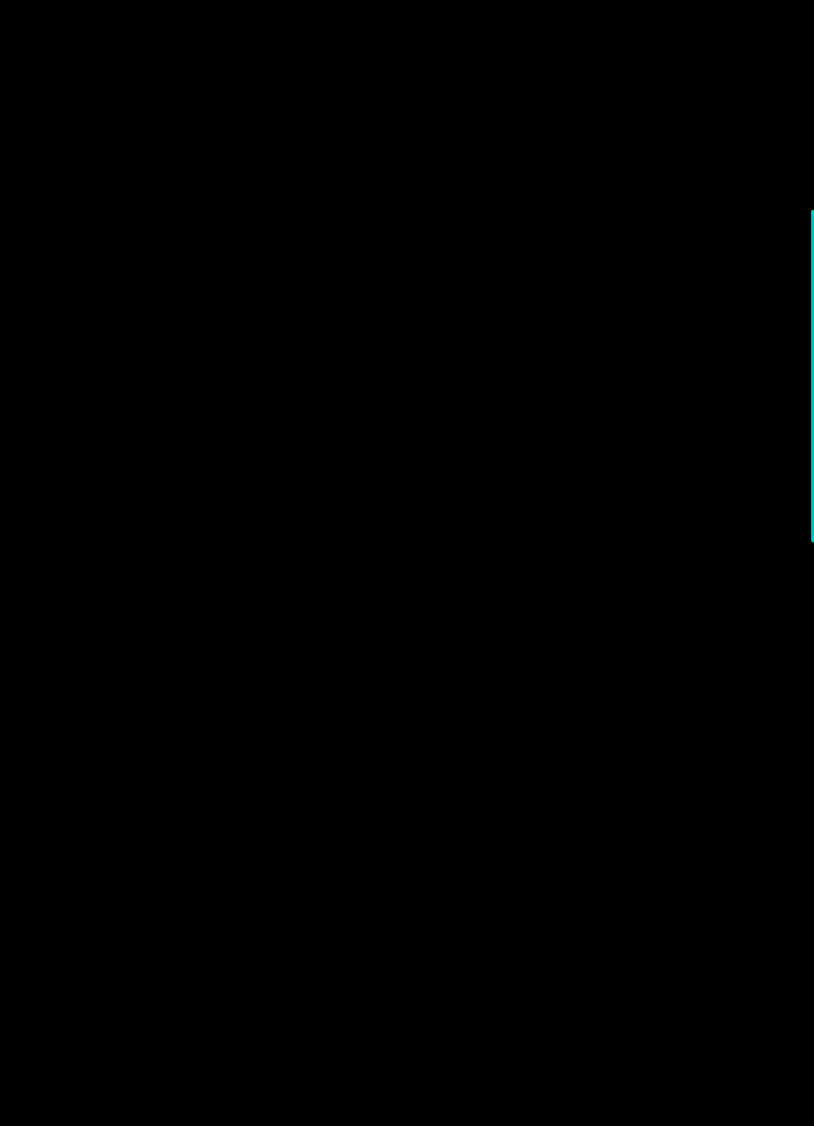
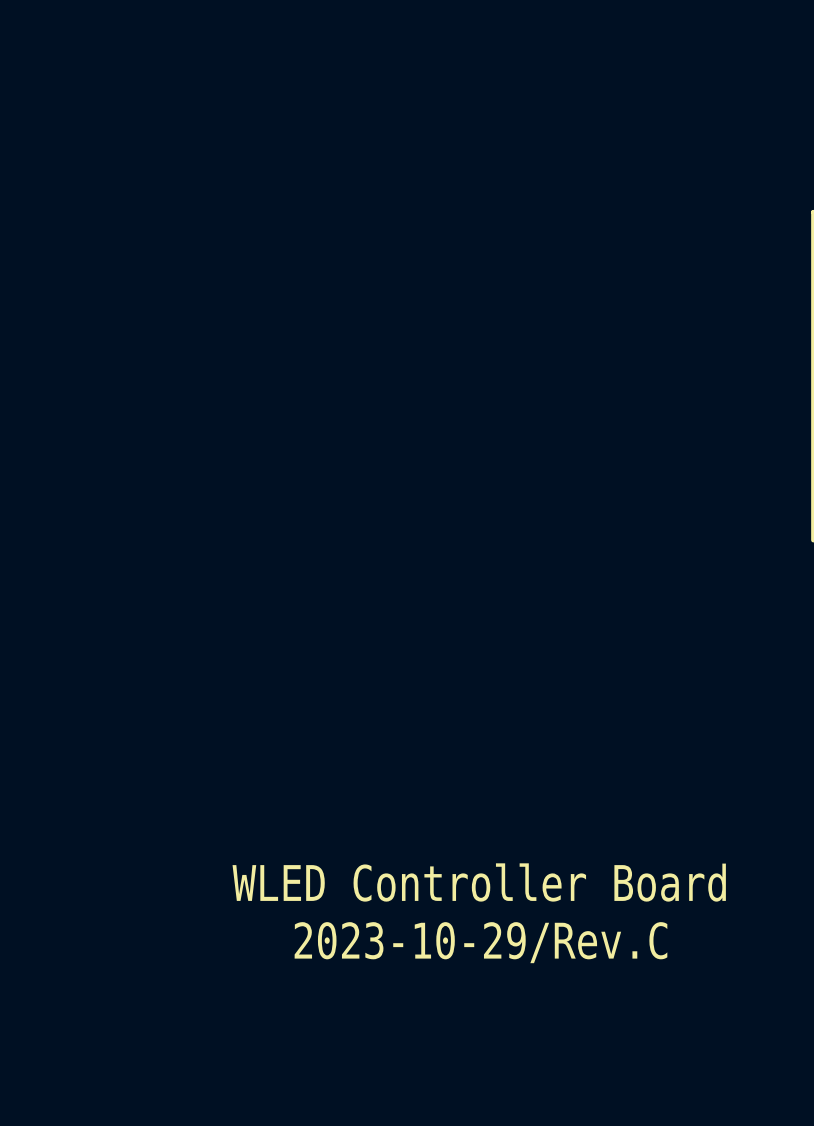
text: none -> WLED Controller Board (479, 882)
text: none -> 2023-10-29/Rev.C (480, 942)

